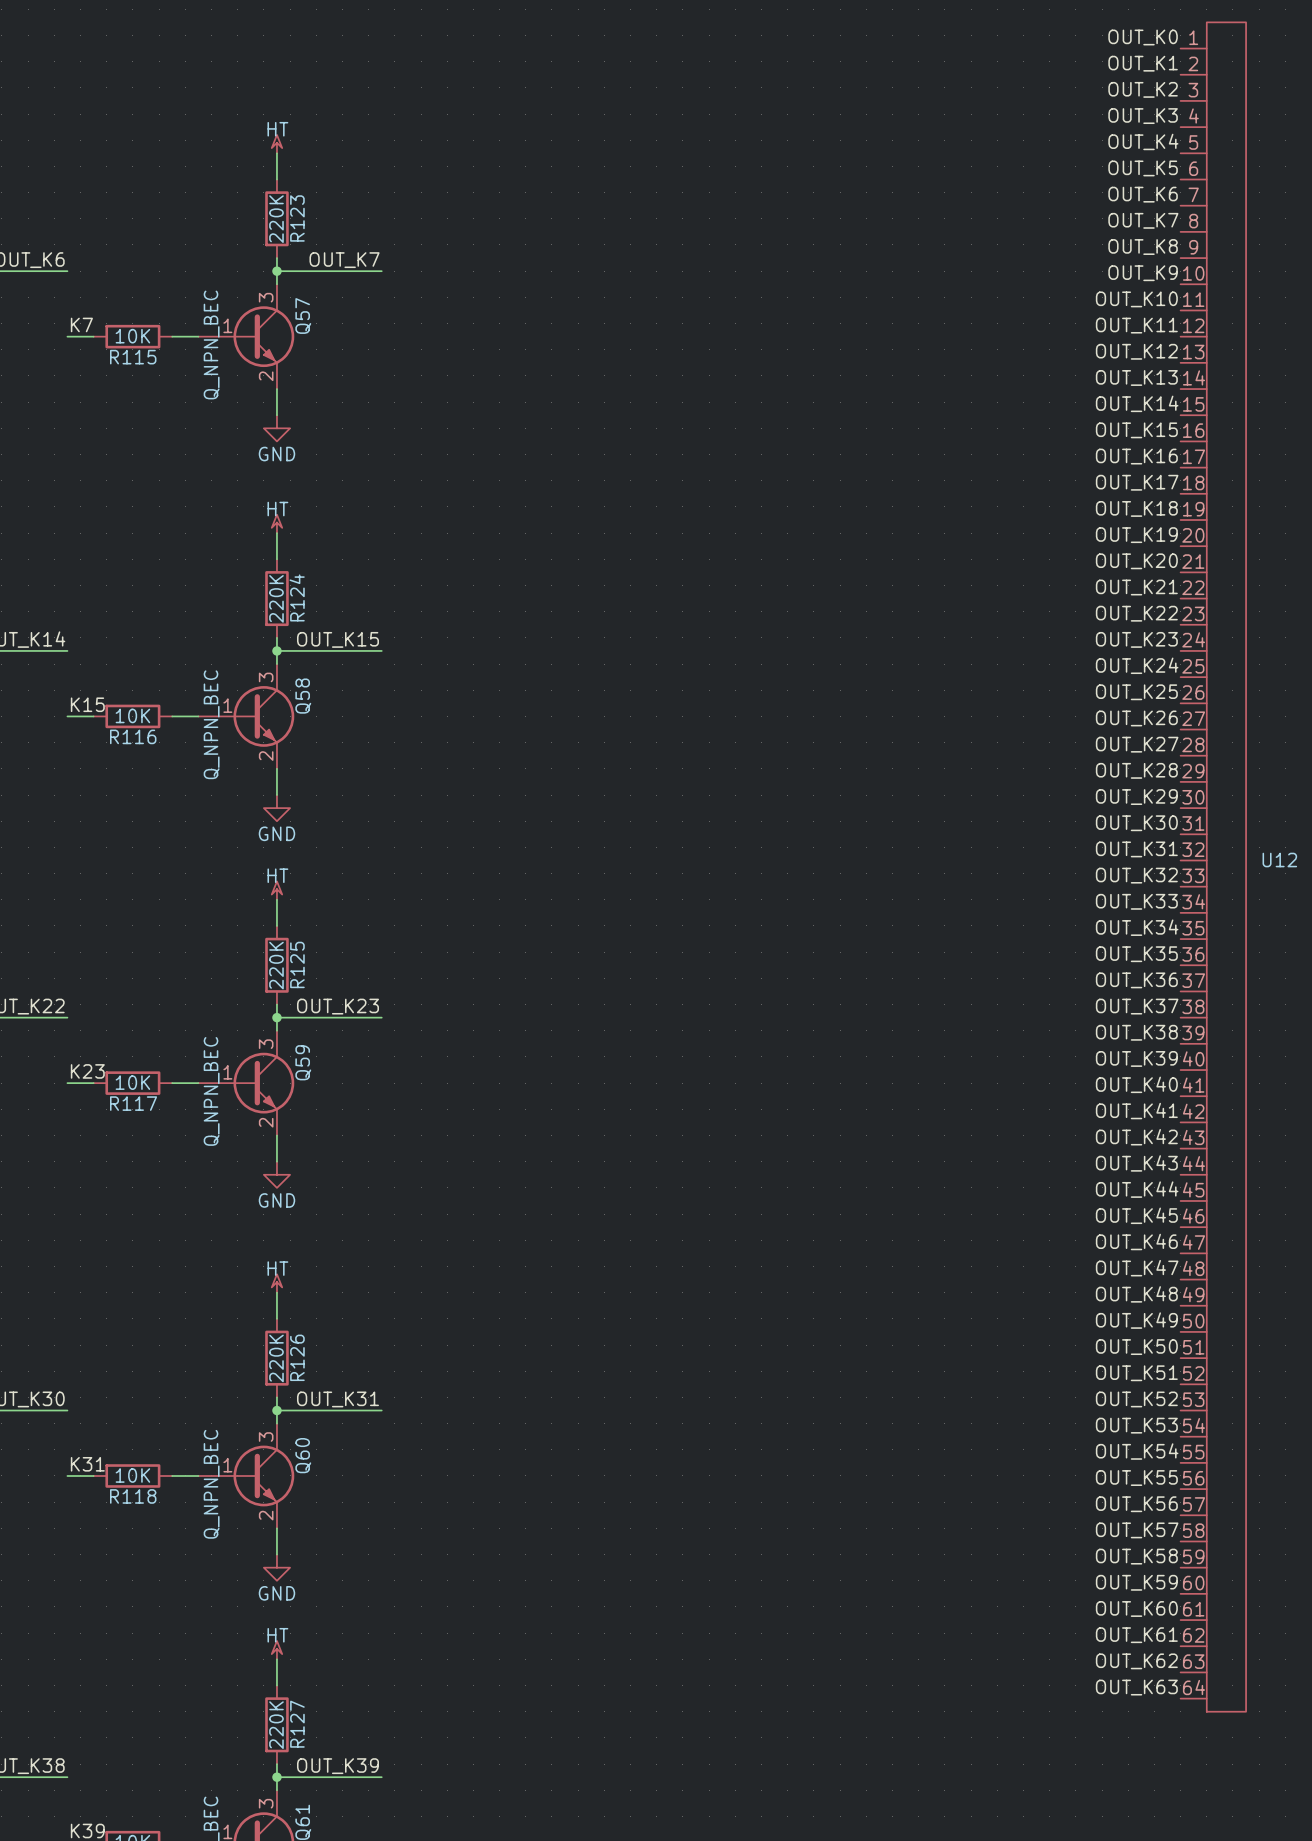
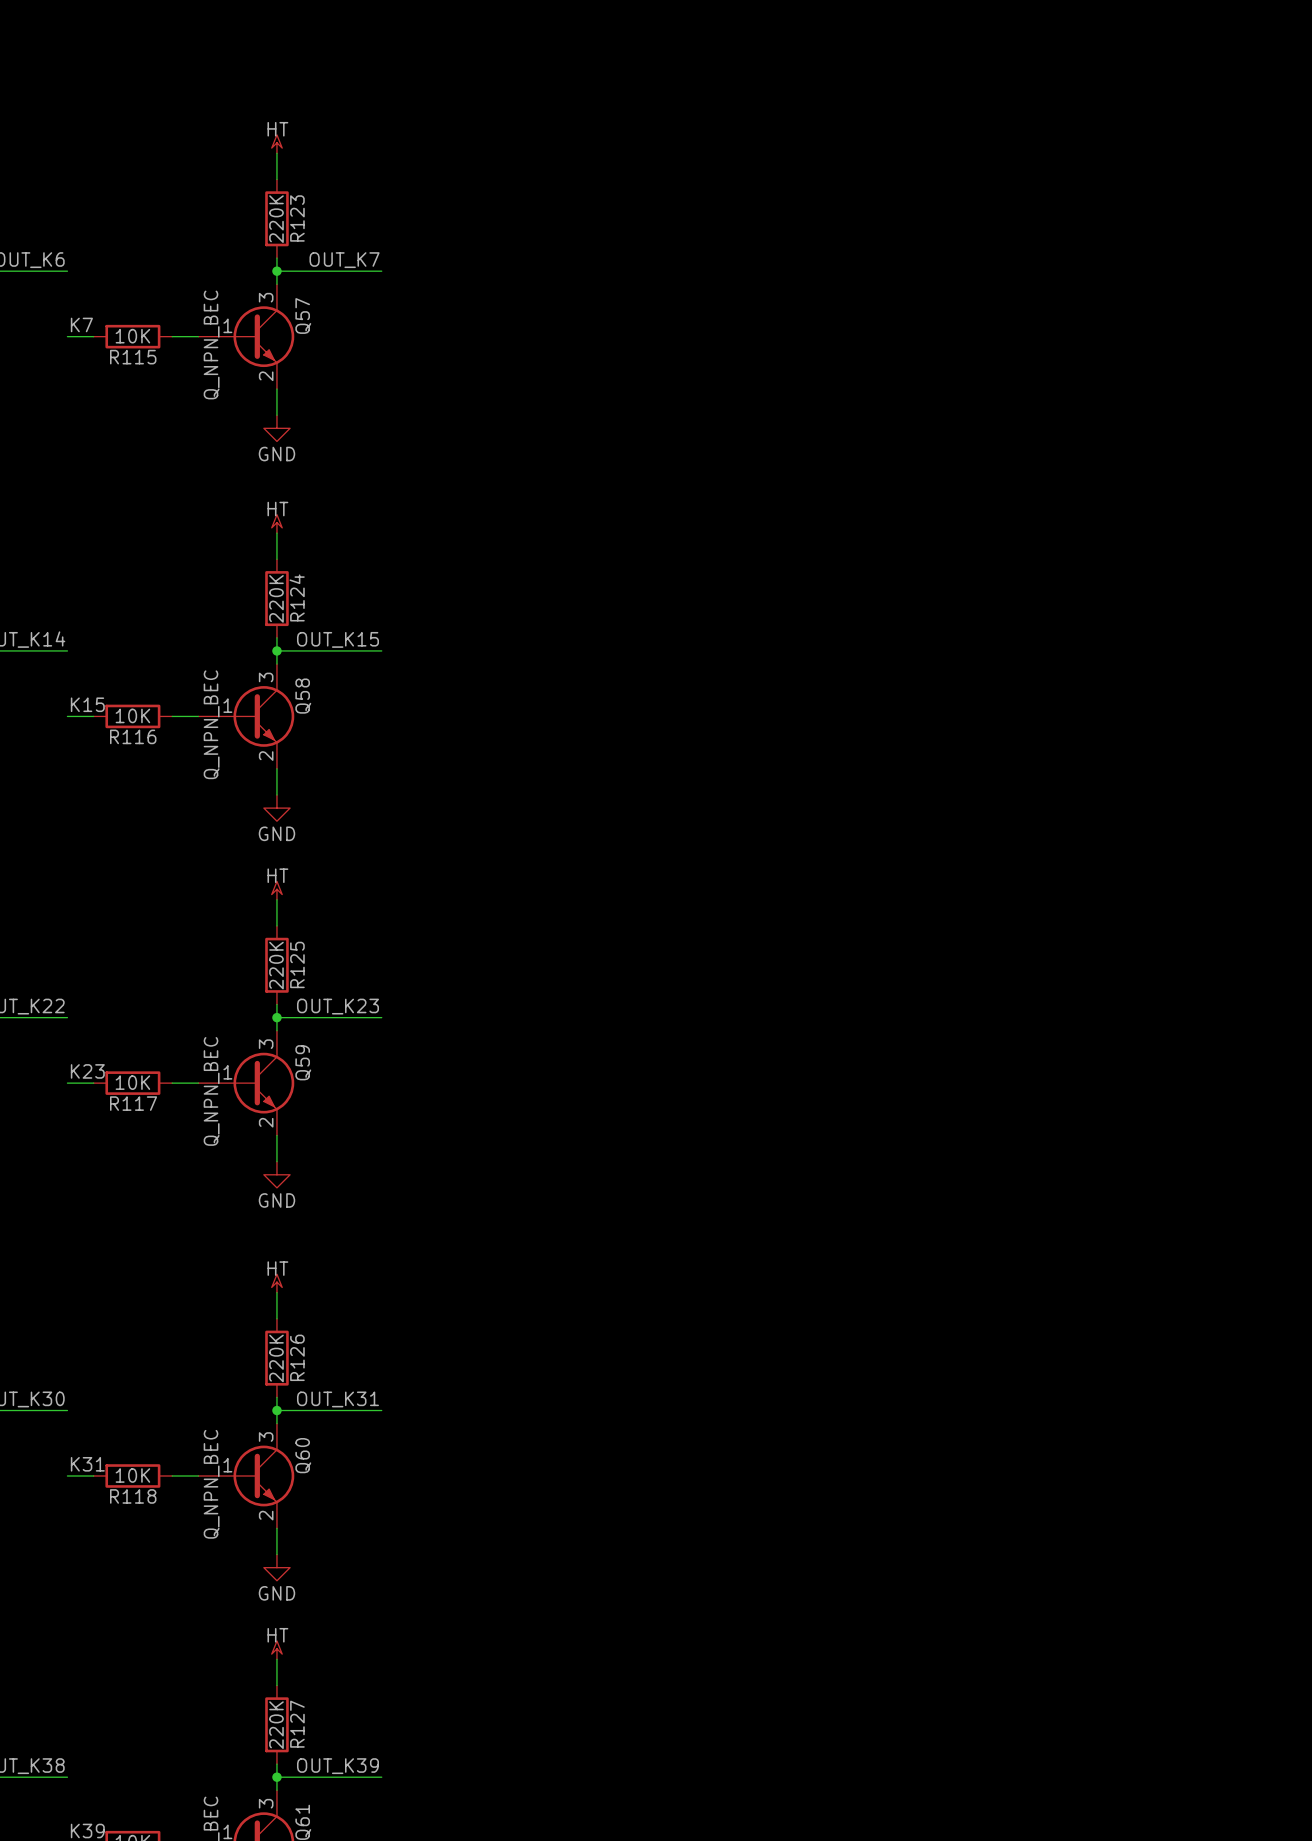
label: OUT_K0 (1143, 37) -> none
label: OUT_K1 (1143, 63) -> none
label: OUT_K2 (1143, 89) -> none
label: OUT_K3 (1143, 116) -> none
label: OUT_K4 (1143, 141) -> none
label: OUT_K5 (1143, 168) -> none
label: OUT_K6 (1143, 194) -> none
label: OUT_K7 (1143, 220) -> none
label: OUT_K8 (1143, 247) -> none
label: OUT_K9 (1143, 273) -> none
label: OUT_K10 (1136, 299) -> none
label: OUT_K11 (1136, 325) -> none
label: OUT_K12 (1136, 351) -> none
label: OUT_K13 (1136, 377) -> none
label: OUT_K14 (1137, 403) -> none
label: OUT_K15 (1136, 430) -> none
label: OUT_K16 (1136, 456) -> none
label: OUT_K17 (1137, 482) -> none
label: OUT_K18 (1136, 508) -> none
label: OUT_K19 (1136, 535) -> none
label: OUT_K20 (1136, 561) -> none
label: OUT_K21 (1136, 587) -> none
label: OUT_K22 (1136, 613) -> none
label: OUT_K23 (1136, 639) -> none
label: OUT_K24 (1137, 665) -> none
label: OUT_K25 (1136, 692) -> none
label: OUT_K26 (1136, 718) -> none
label: OUT_K27 (1137, 744) -> none
label: OUT_K28 (1136, 770) -> none
label: OUT_K29 (1136, 797) -> none
label: OUT_K30 (1136, 823) -> none
label: OUT_K31 (1136, 849) -> none
U12: (1213, 867) -> none
label: OUT_K32 (1136, 875) -> none
label: OUT_K33 (1136, 901) -> none
label: OUT_K34 (1137, 927) -> none
label: OUT_K35 (1136, 954) -> none
label: OUT_K36 (1136, 980) -> none
label: OUT_K37 (1137, 1006) -> none
label: OUT_K38 (1136, 1032) -> none
label: OUT_K39 (1136, 1058) -> none
label: OUT_K40 (1136, 1084) -> none
label: OUT_K41 (1136, 1111) -> none
label: OUT_K42 (1136, 1137) -> none
label: OUT_K43 (1136, 1163) -> none
label: OUT_K44 (1137, 1189) -> none
label: OUT_K45 (1136, 1215) -> none
label: OUT_K46 (1136, 1241) -> none
label: OUT_K47 (1137, 1268) -> none
label: OUT_K48 (1136, 1294) -> none
label: OUT_K49 (1136, 1320) -> none
label: OUT_K50 (1136, 1347) -> none
label: OUT_K51 (1136, 1373) -> none
label: OUT_K52 (1136, 1399) -> none
label: OUT_K53 (1136, 1425) -> none
label: OUT_K54 (1137, 1451) -> none
label: OUT_K55 (1136, 1478) -> none
label: OUT_K56 (1136, 1504) -> none
label: OUT_K57 (1137, 1530) -> none
label: OUT_K58 (1136, 1556) -> none
label: OUT_K59 (1136, 1582) -> none
label: OUT_K60 (1136, 1608) -> none
label: OUT_K61 (1136, 1635) -> none
label: OUT_K62 (1136, 1661) -> none
label: OUT_K63 (1136, 1687) -> none

